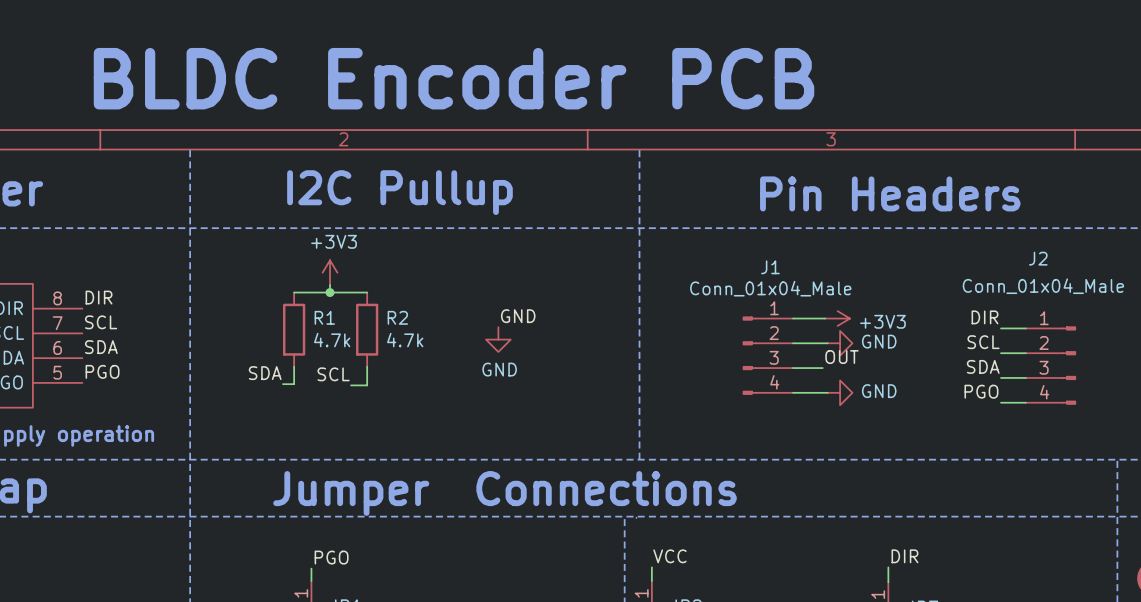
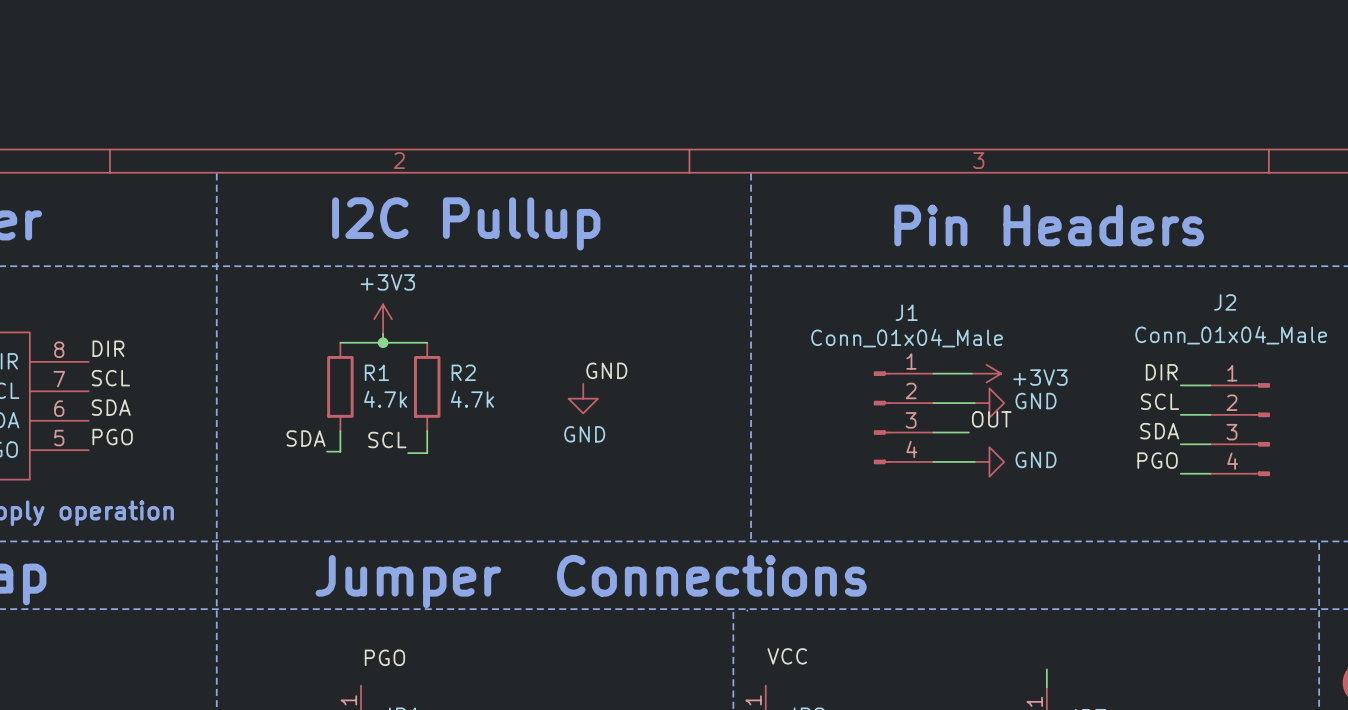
text: BLDC Encoder PCB (454, 78) -> none
label: DIR (904, 556) -> none
wire: (651, 567) (651, 581) -> none
wire: (311, 568) (311, 581) -> none

